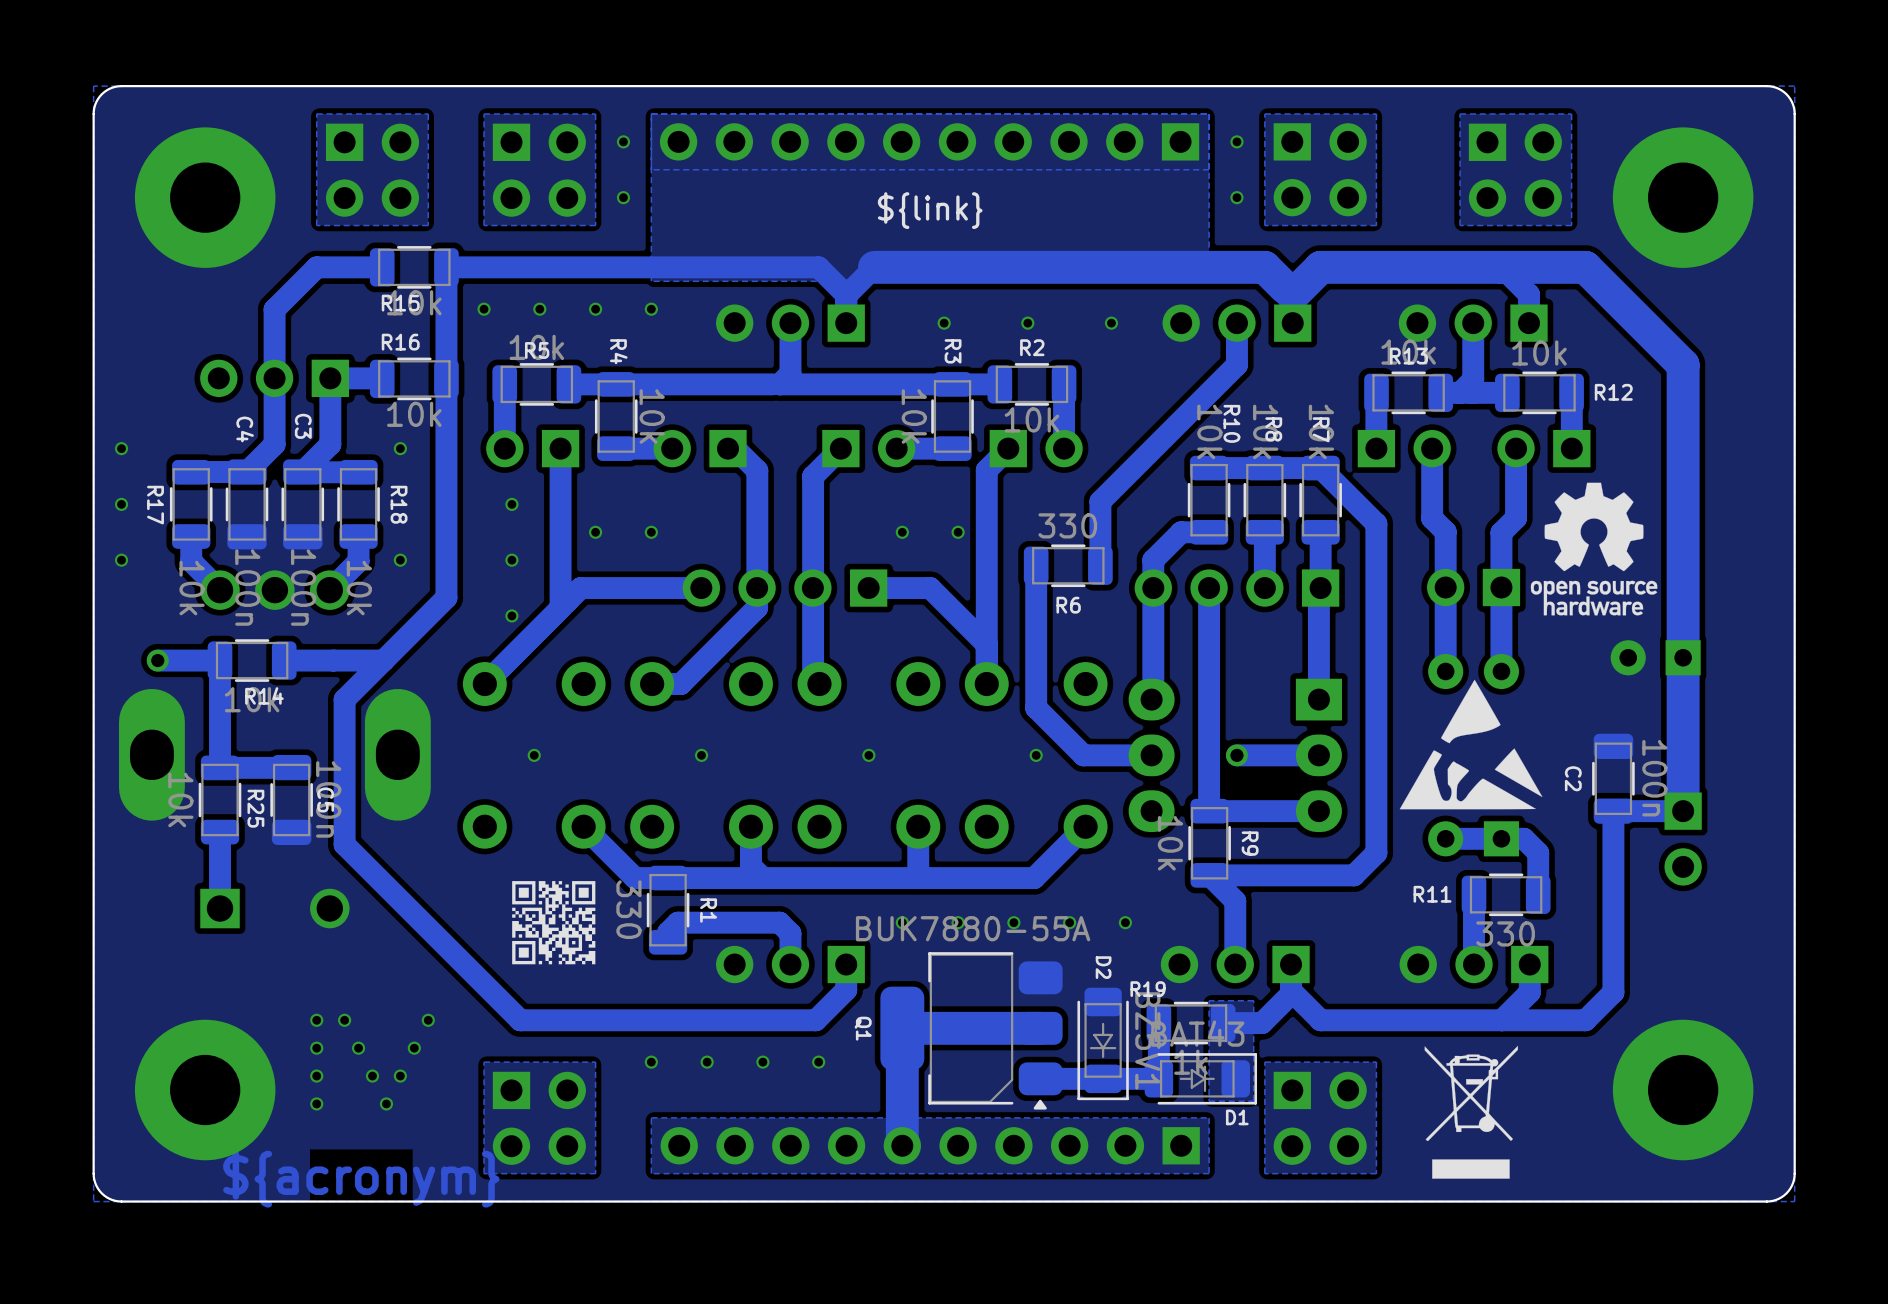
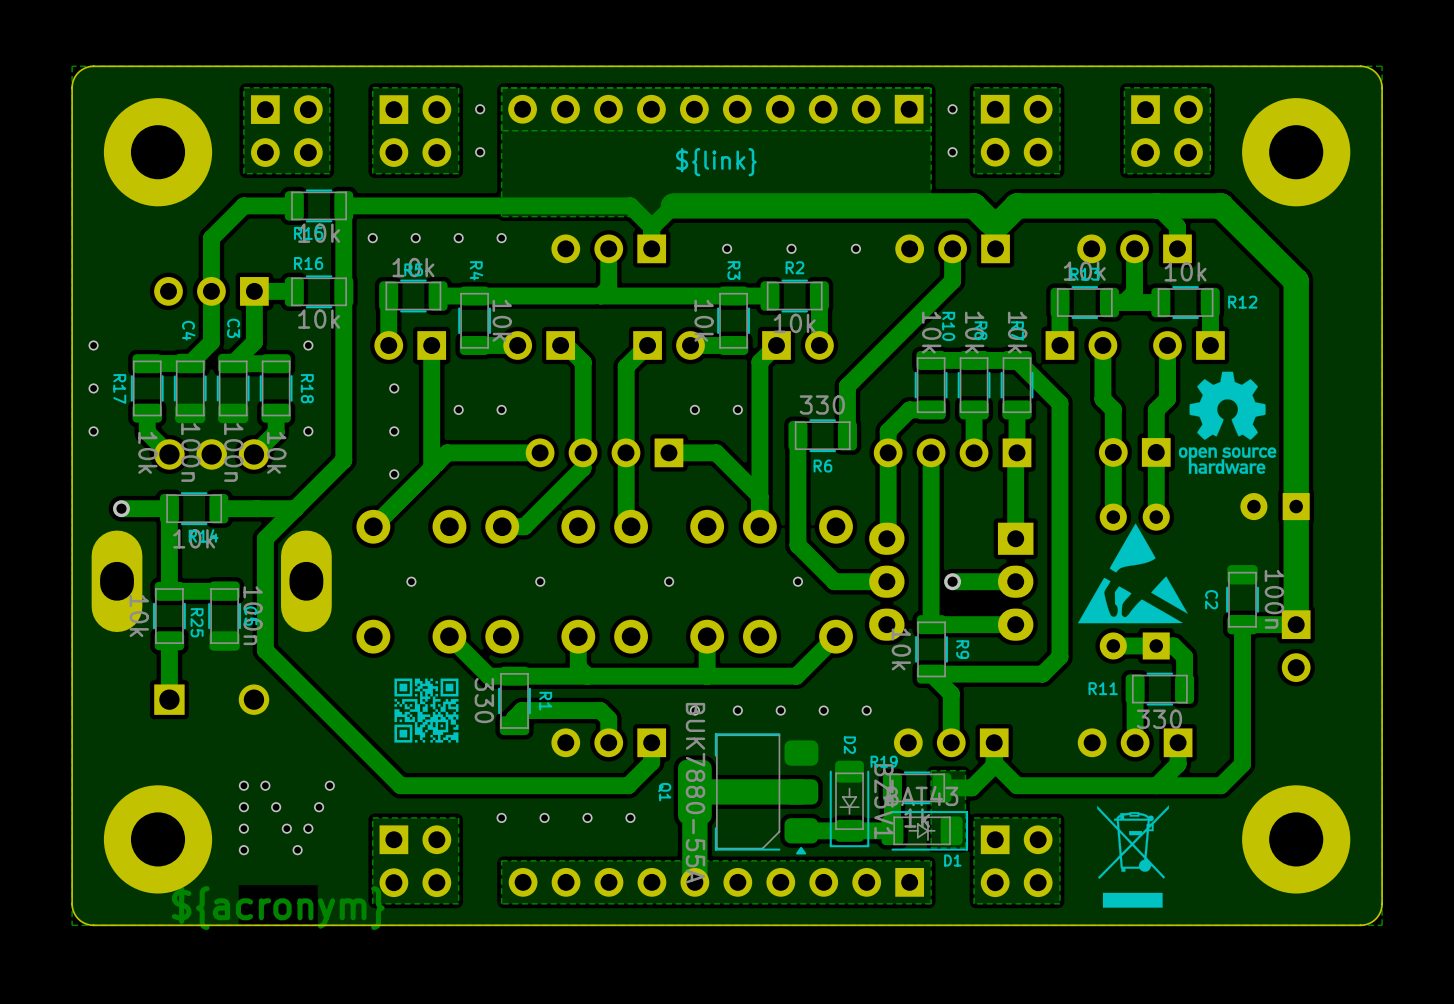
Q1 value rotation: 0° (973, 928) -> 90° clockwise (695, 793)

